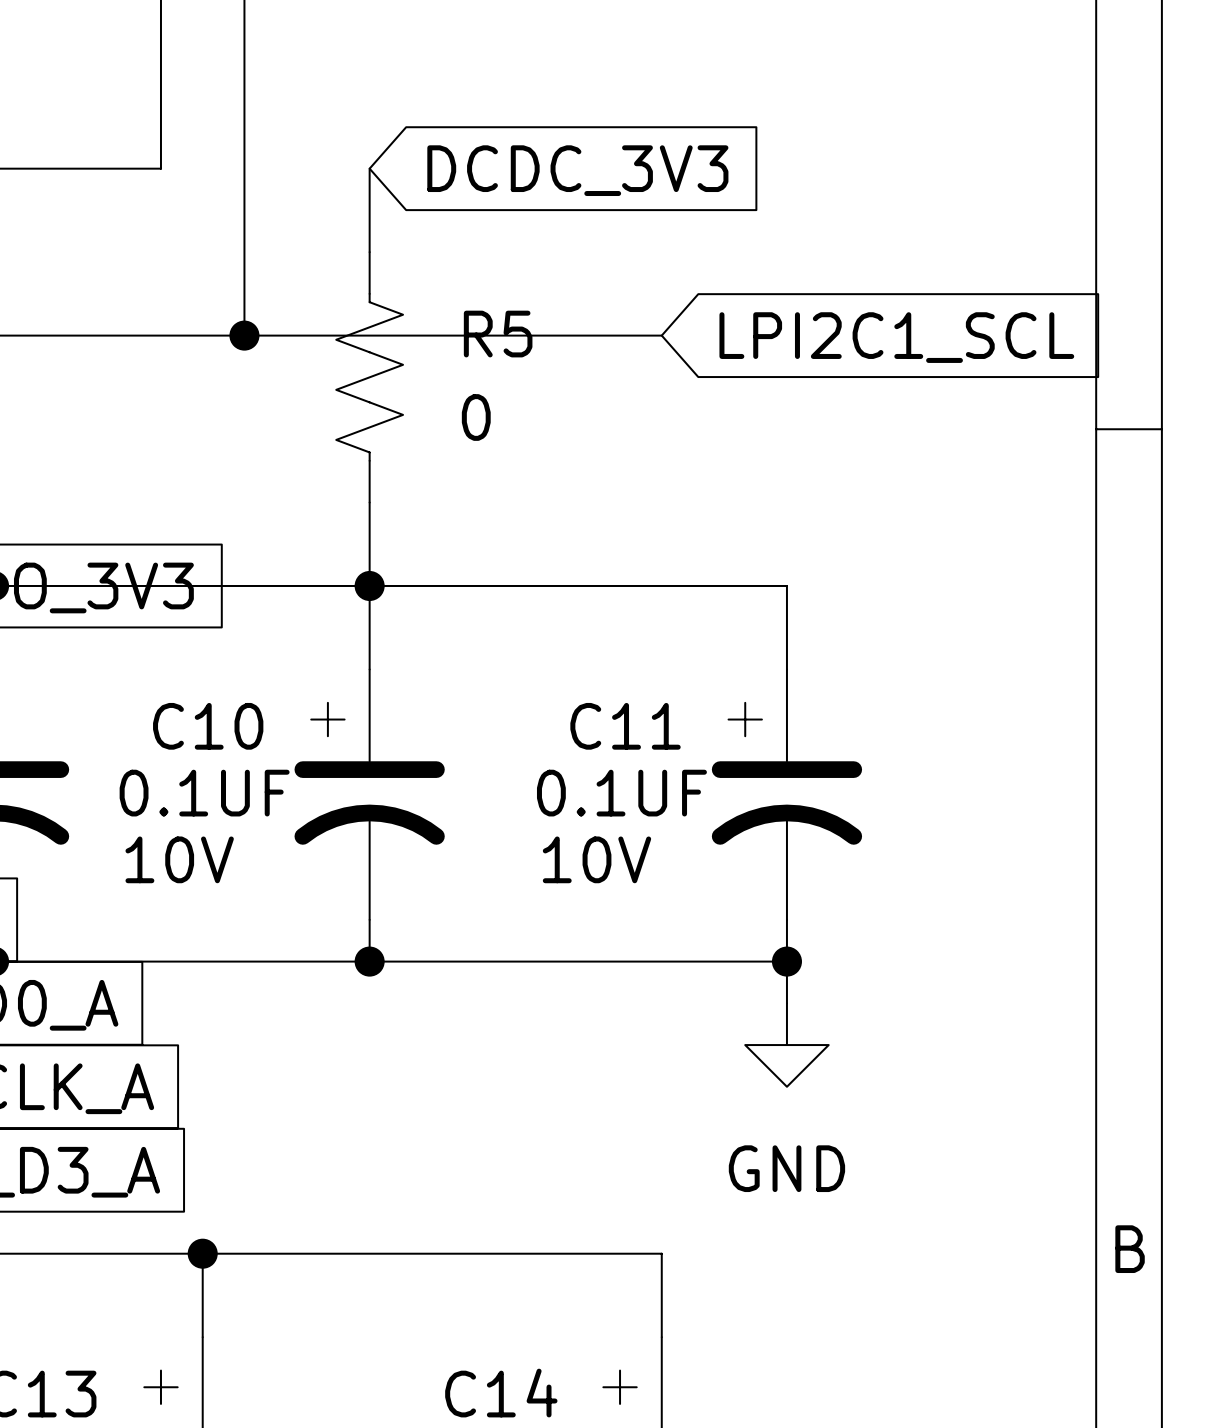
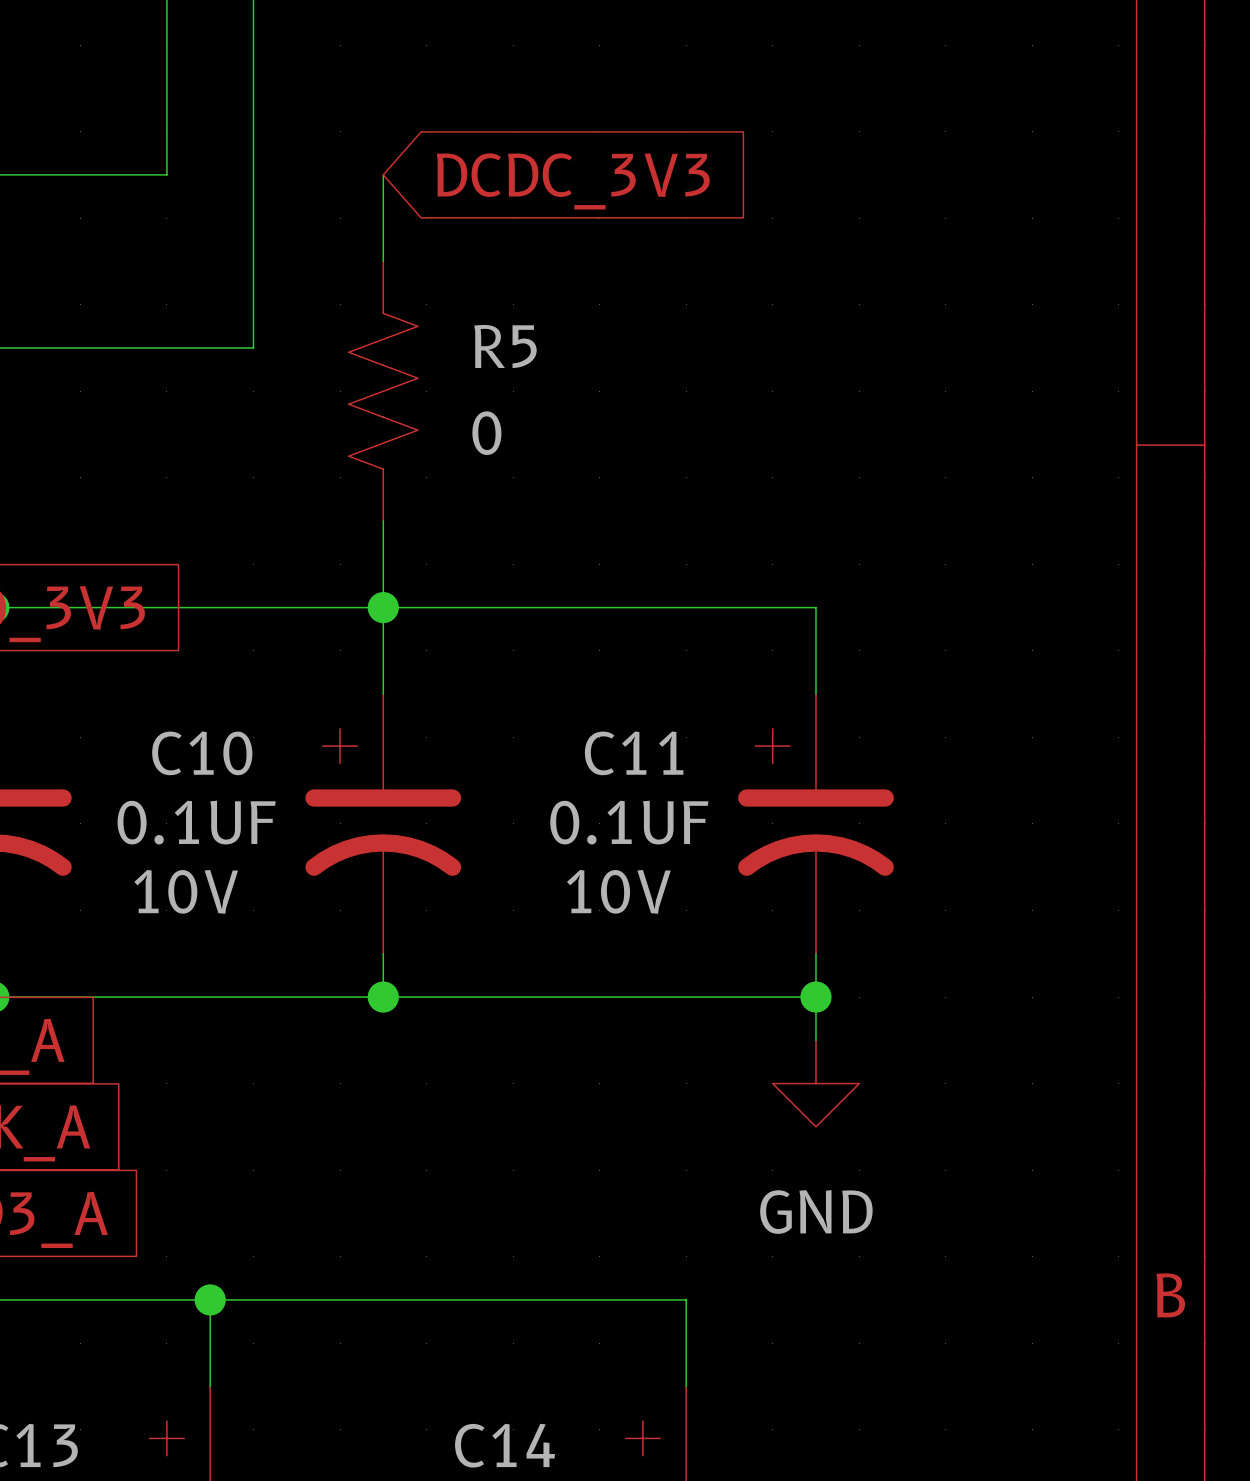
wire: (244, 335) (661, 335) -> none
junction: (244, 335) -> none
global label: LPI2C1_SCL (896, 337) -> none

